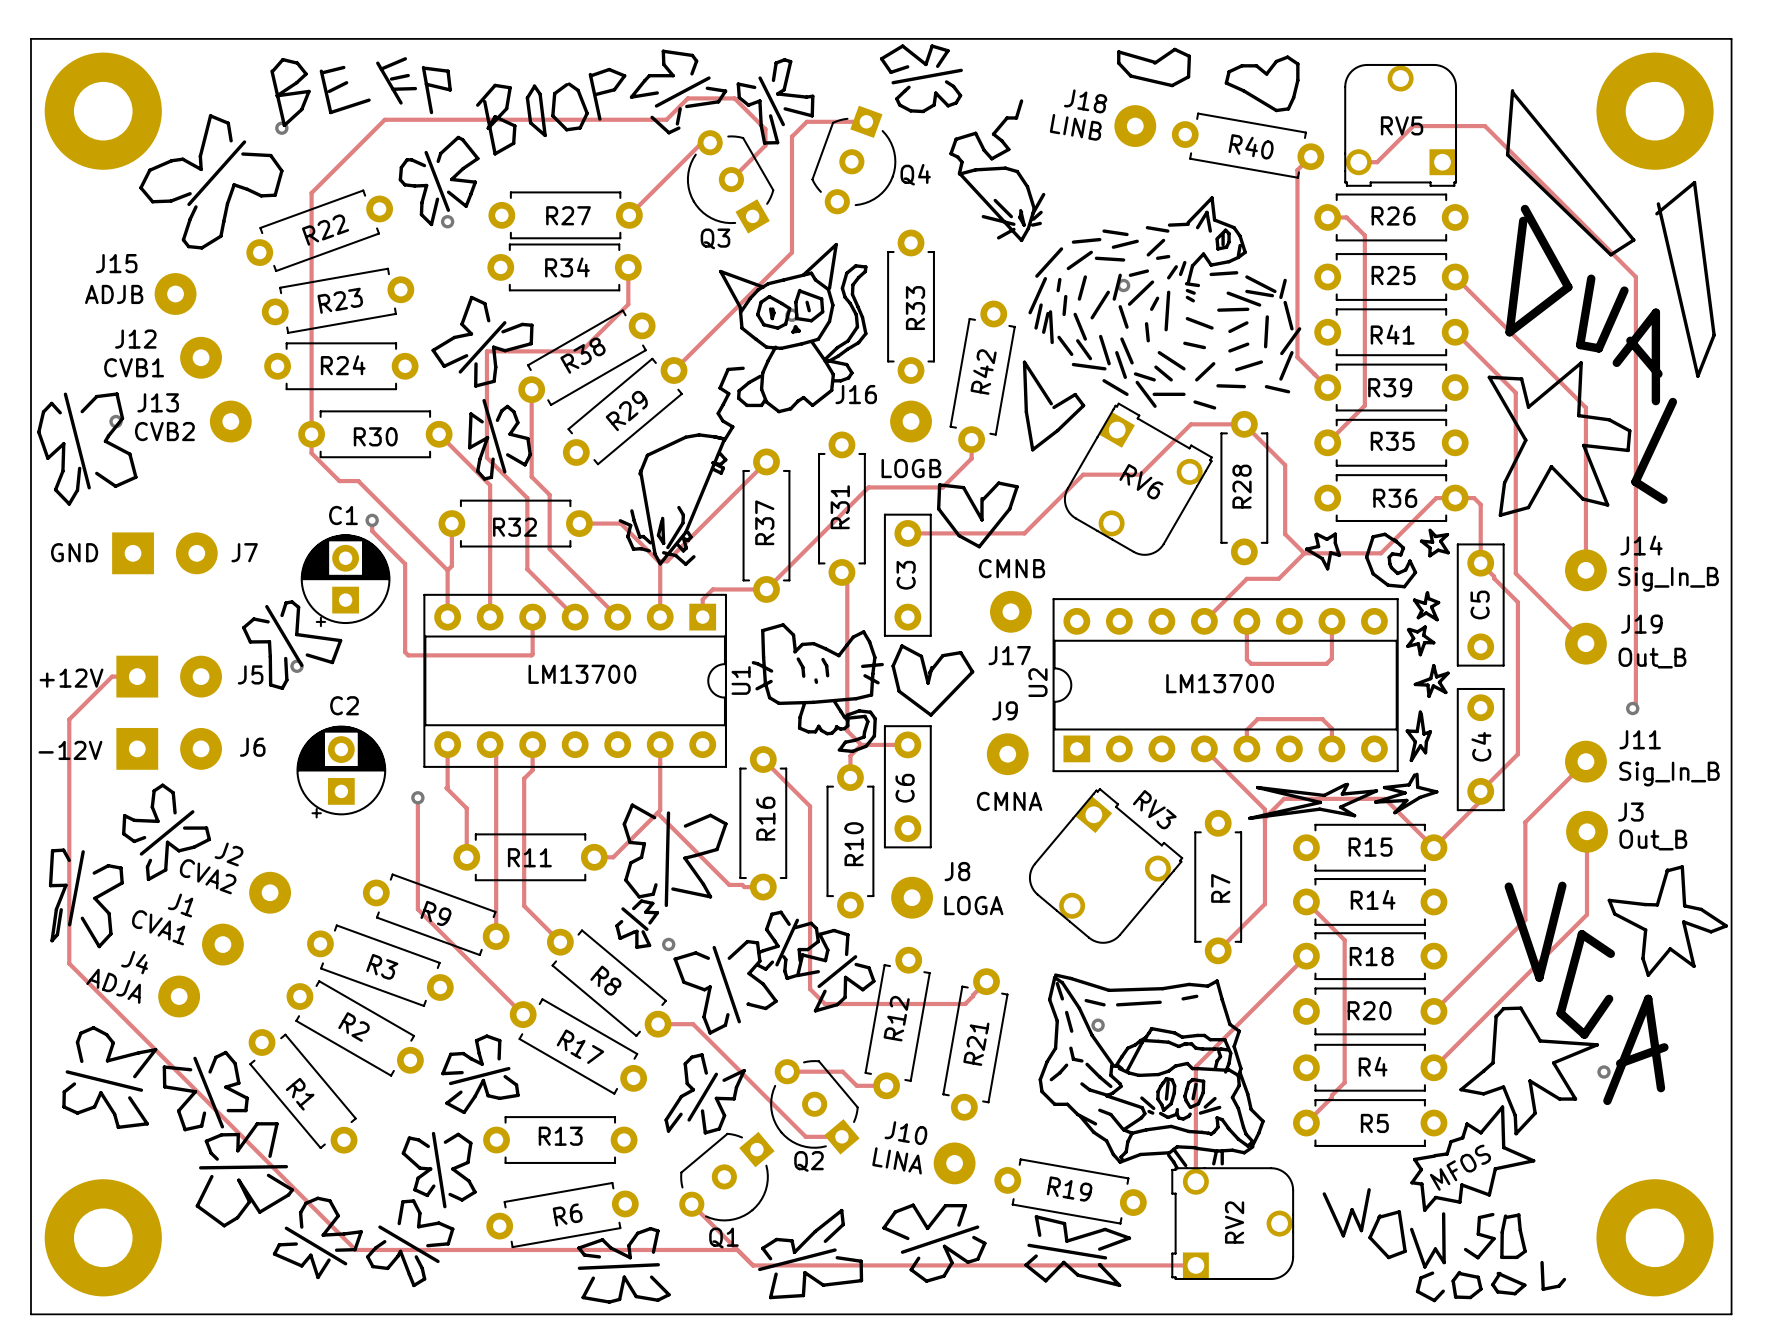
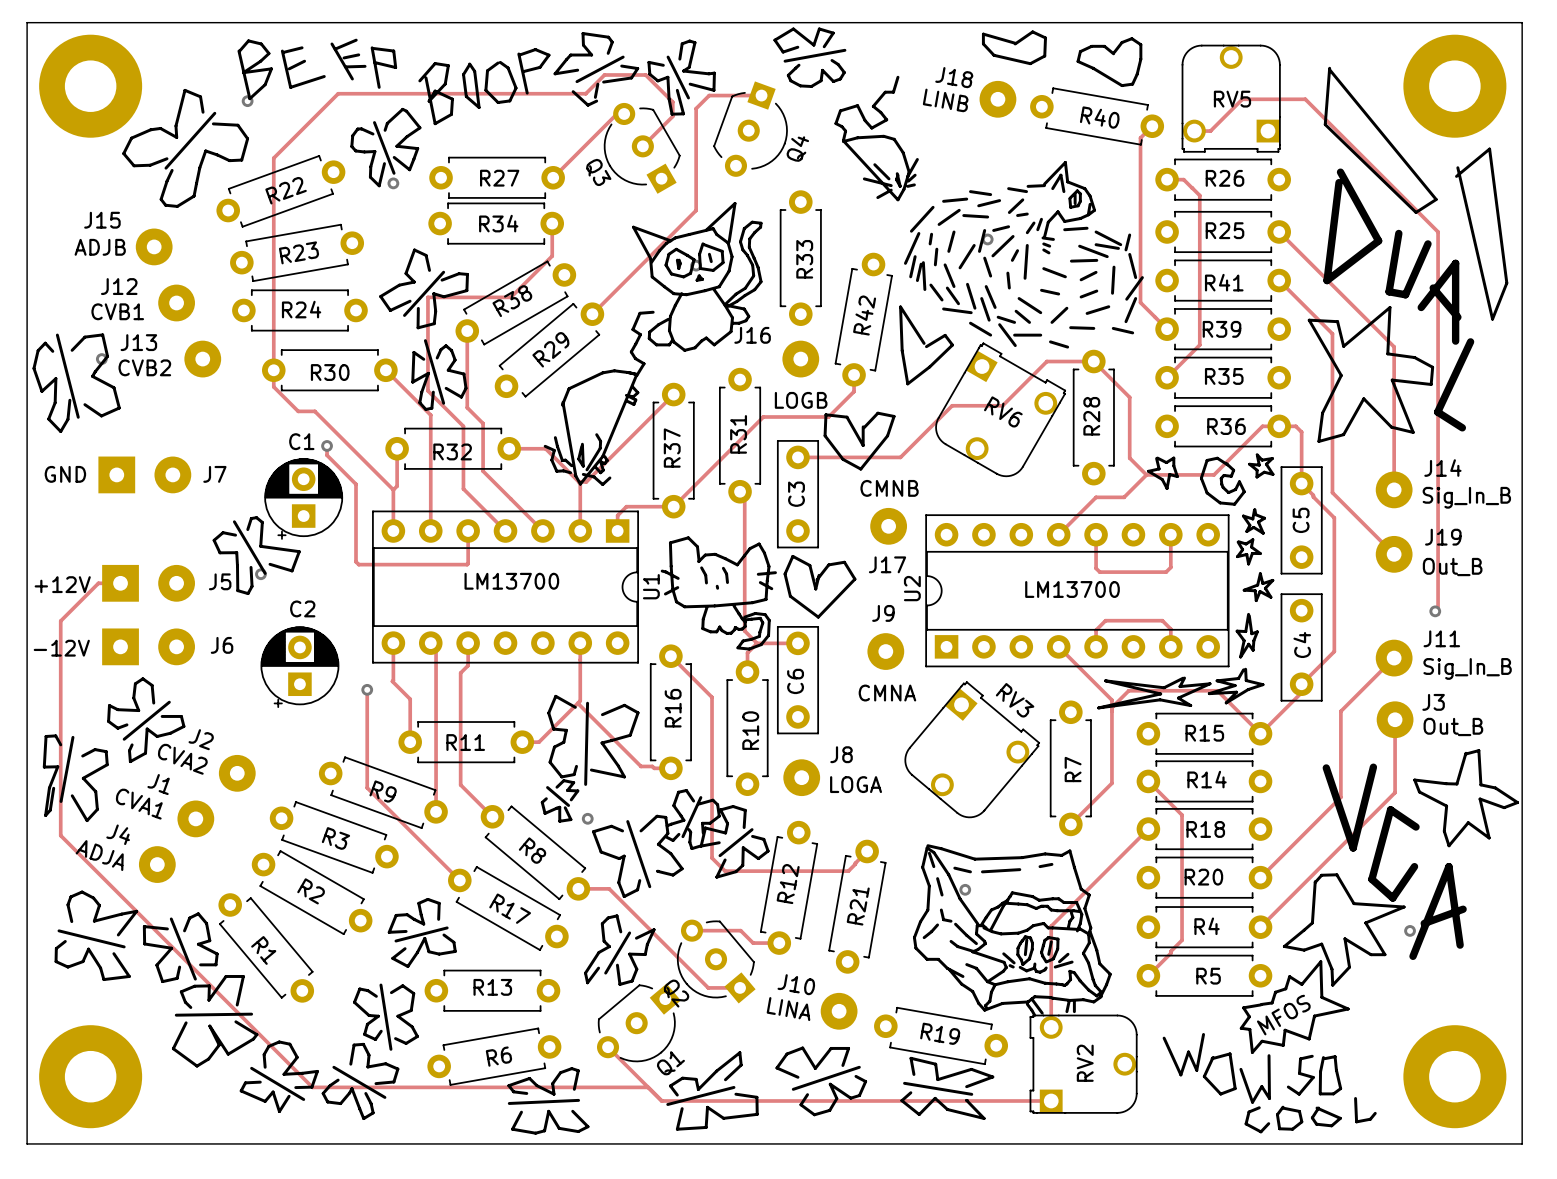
Q4 name rotation: 0° (915, 174) -> 70° counterclockwise (797, 149)
Q3 name rotation: 0° (715, 238) -> 60° clockwise (598, 172)
Q3 name position: Q3 (715, 238) -> Q3 (598, 172)
Q2 name rotation: 0° (809, 1161) -> 50° clockwise (676, 993)
Q2 name position: Q2 (809, 1161) -> Q2 (676, 993)
Q1 name rotation: 0° (723, 1237) -> 40° counterclockwise (670, 1063)

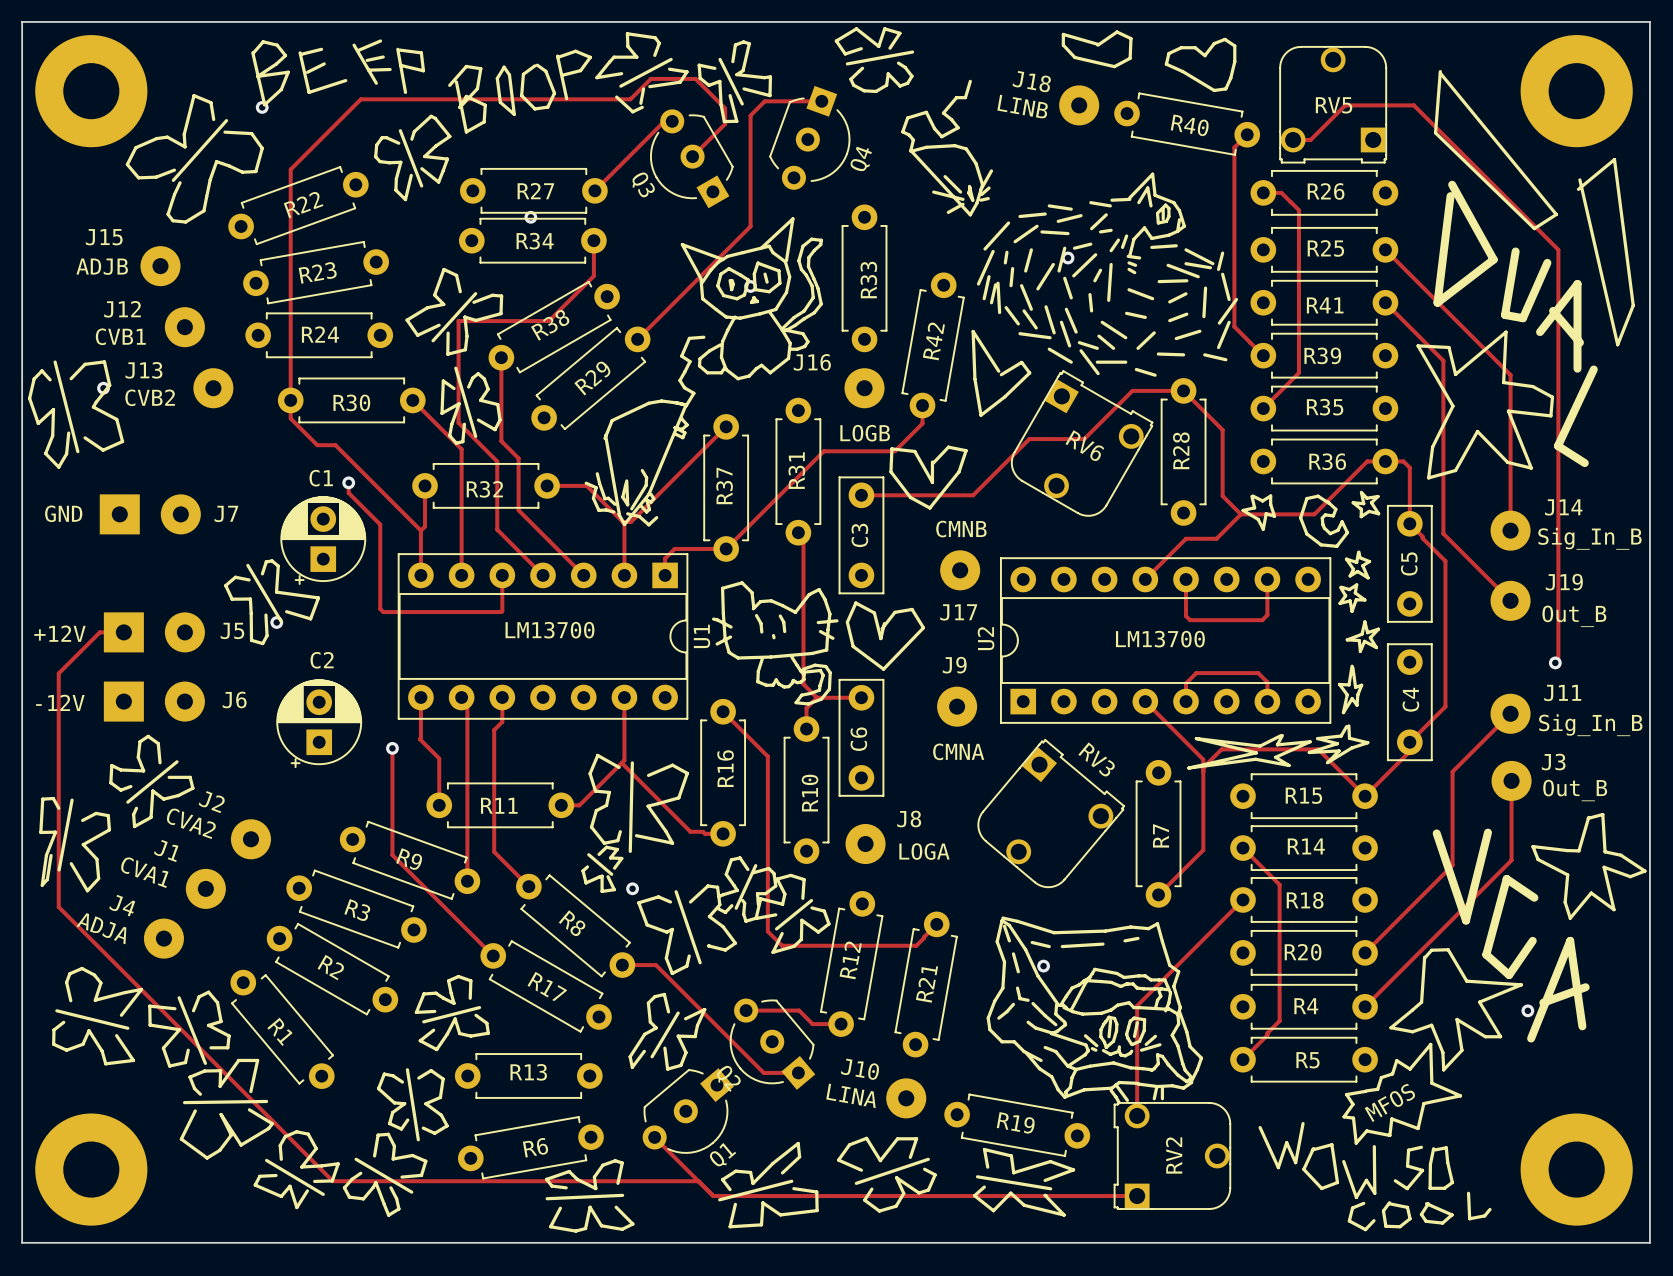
via: (393, 183) -> none
via: none -> (530, 217)

